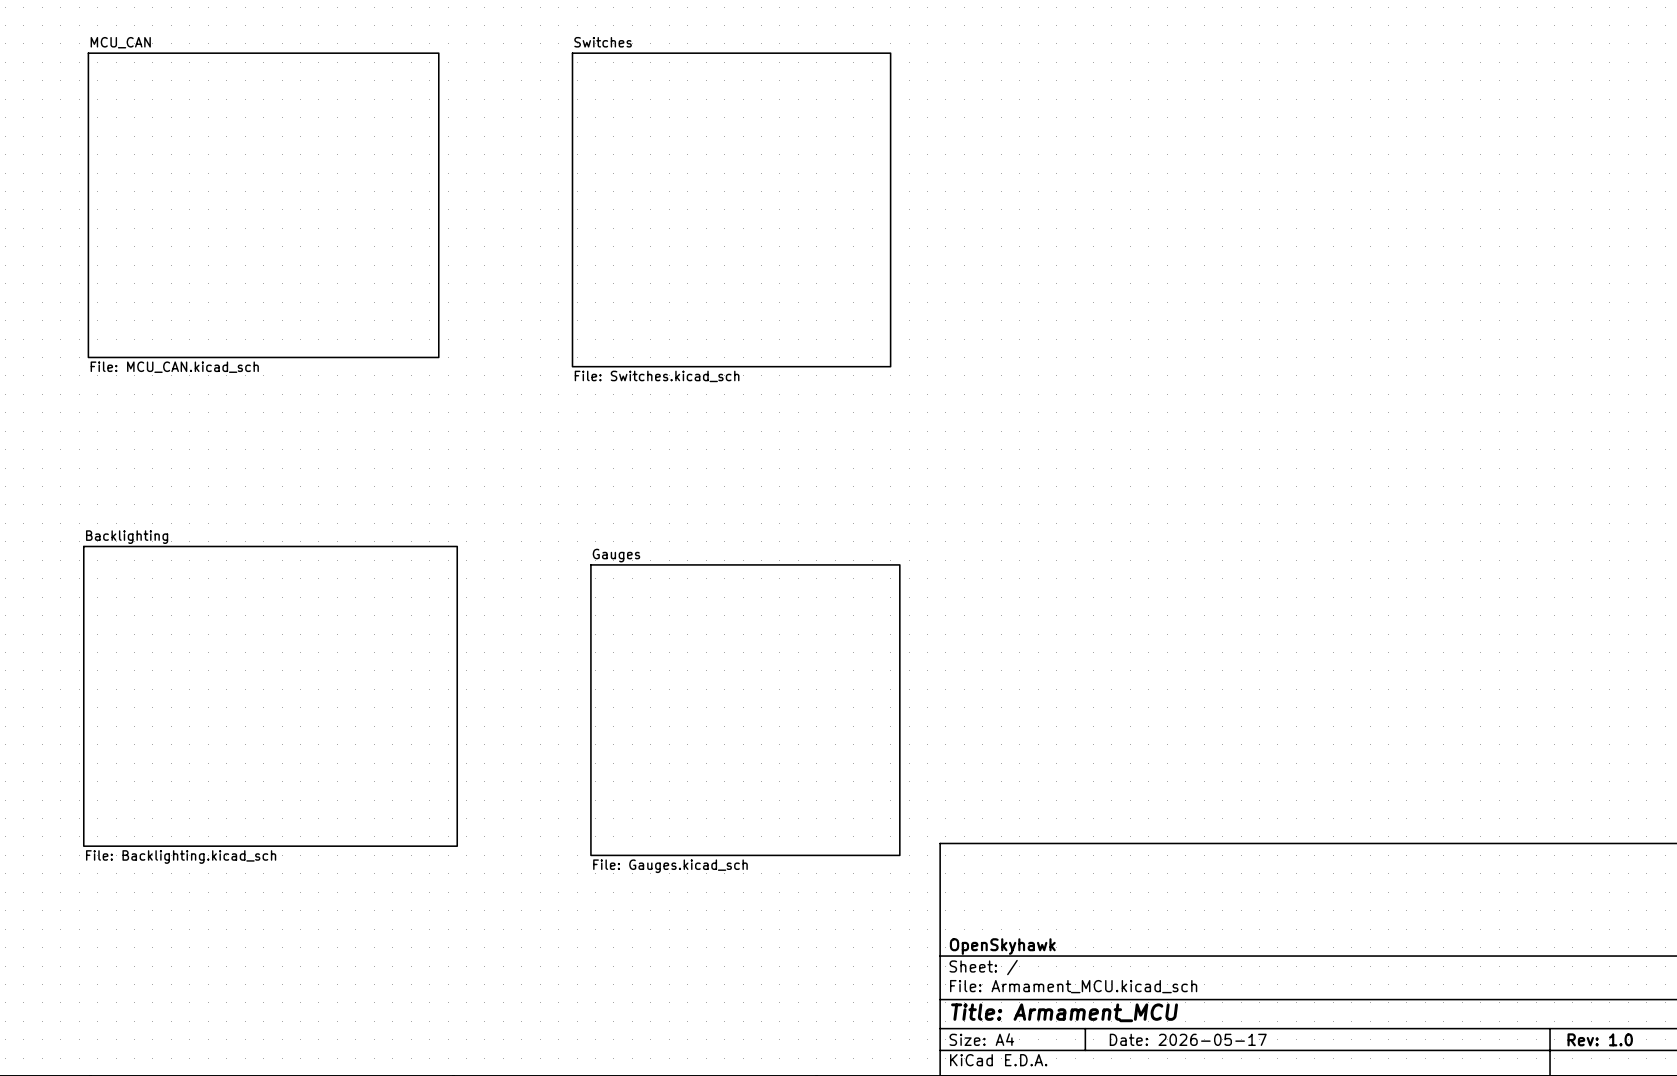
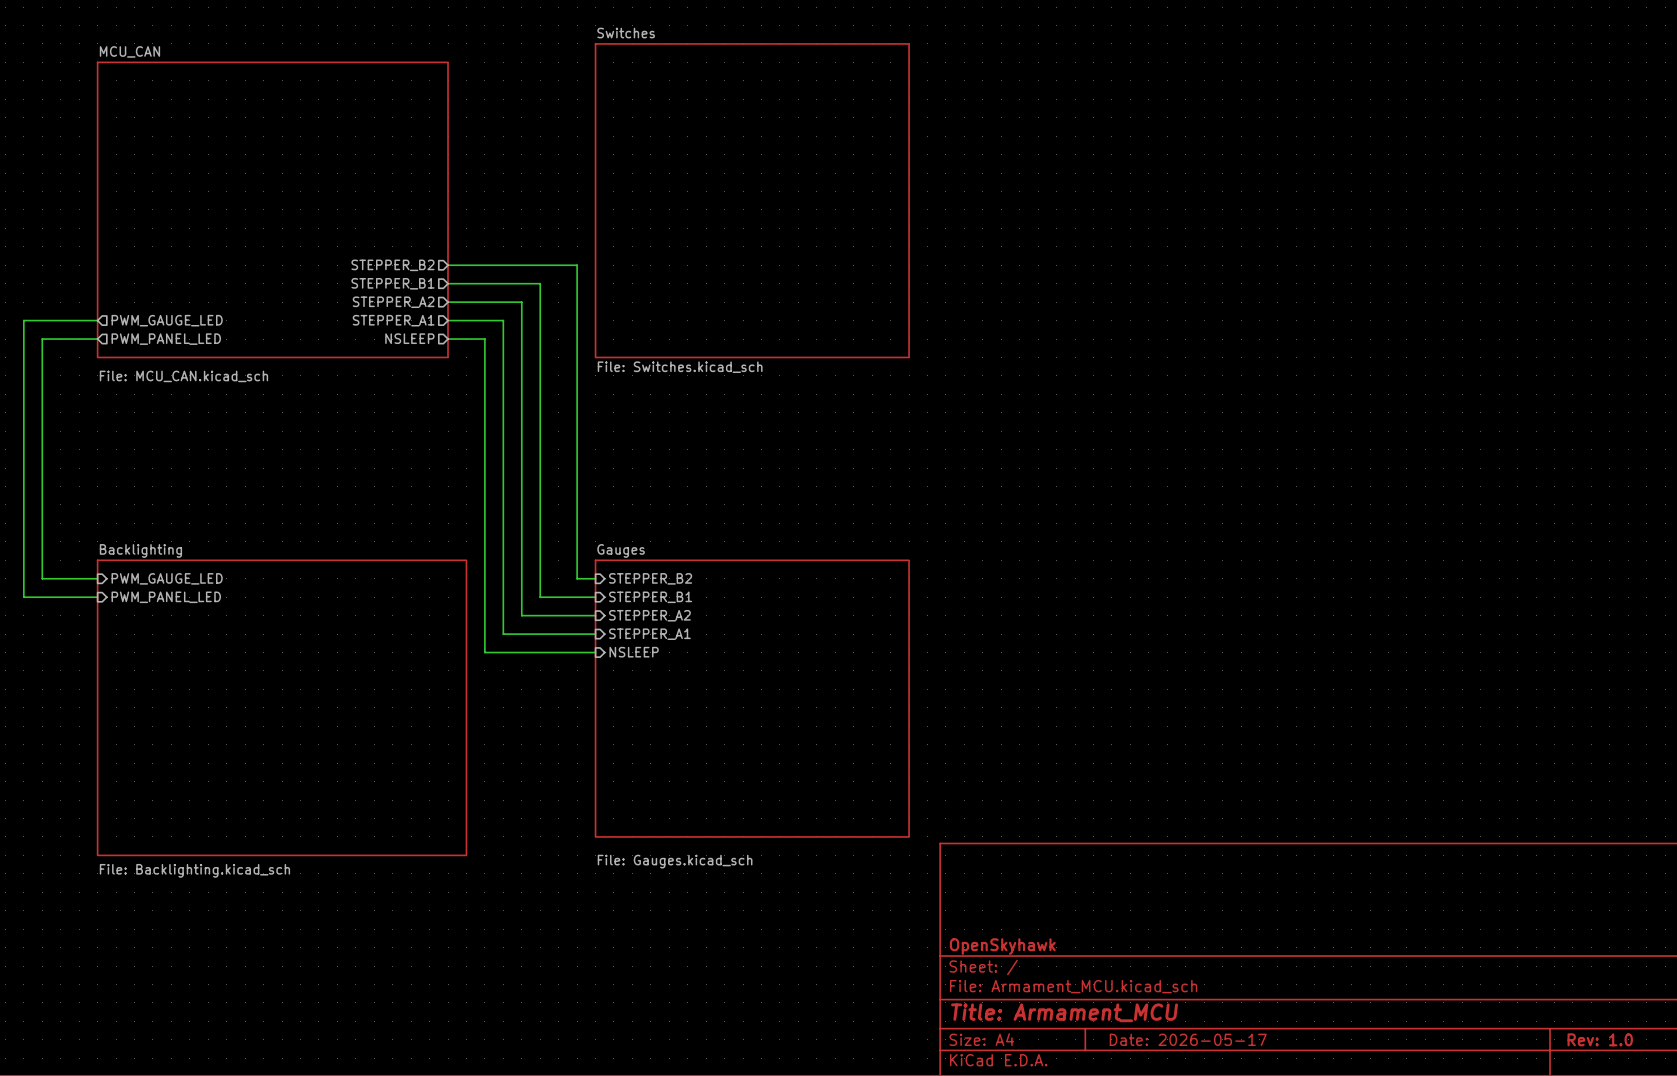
sheet Switches: none -> File: Switches.kicad_sch (752, 200)
sheet MCU_CAN: File: MCU_CAN.kicad_sch (263, 205) -> none
sheet MCU_CAN: none -> File: MCU_CAN.kicad_sch (272, 209)
sheet Switches: File: Switches.kicad_sch (731, 209) -> none
sheet pin: none -> STEPPER_B2 (392, 265)
wire: none -> (448, 265) (577, 265) (577, 578) (595, 578)
sheet pin: none -> STEPPER_B1 (392, 283)
wire: none -> (448, 283) (540, 283) (540, 597) (595, 597)
sheet pin: none -> STEPPER_A2 (393, 302)
wire: none -> (448, 302) (521, 302) (521, 615) (595, 615)
wire: none -> (97, 320) (23, 320) (23, 597) (97, 597)
sheet pin: none -> PWM_GAUGE_LED (167, 320)
sheet pin: none -> STEPPER_A1 (393, 320)
wire: none -> (448, 320) (503, 320) (503, 634) (595, 634)
sheet pin: none -> NSLEEP (409, 338)
wire: none -> (97, 339) (42, 339) (42, 578) (97, 578)
sheet pin: none -> PWM_PANEL_LED (166, 339)
wire: none -> (448, 339) (484, 339) (484, 652) (595, 652)
sheet pin: none -> PWM_GAUGE_LED (167, 578)
sheet pin: none -> STEPPER_B2 (650, 578)
sheet pin: none -> PWM_PANEL_LED (166, 597)
sheet pin: none -> STEPPER_B1 (650, 597)
sheet pin: none -> STEPPER_A2 (649, 615)
sheet pin: none -> STEPPER_A1 (649, 634)
sheet pin: none -> NSLEEP (634, 652)
sheet Backlighting: File: Backlighting.kicad_sch (270, 696) -> none
sheet Gauges: none -> File: Gauges.kicad_sch (752, 698)
sheet Backlighting: none -> File: Backlighting.kicad_sch (282, 707)
sheet Gauges: File: Gauges.kicad_sch (745, 710) -> none

